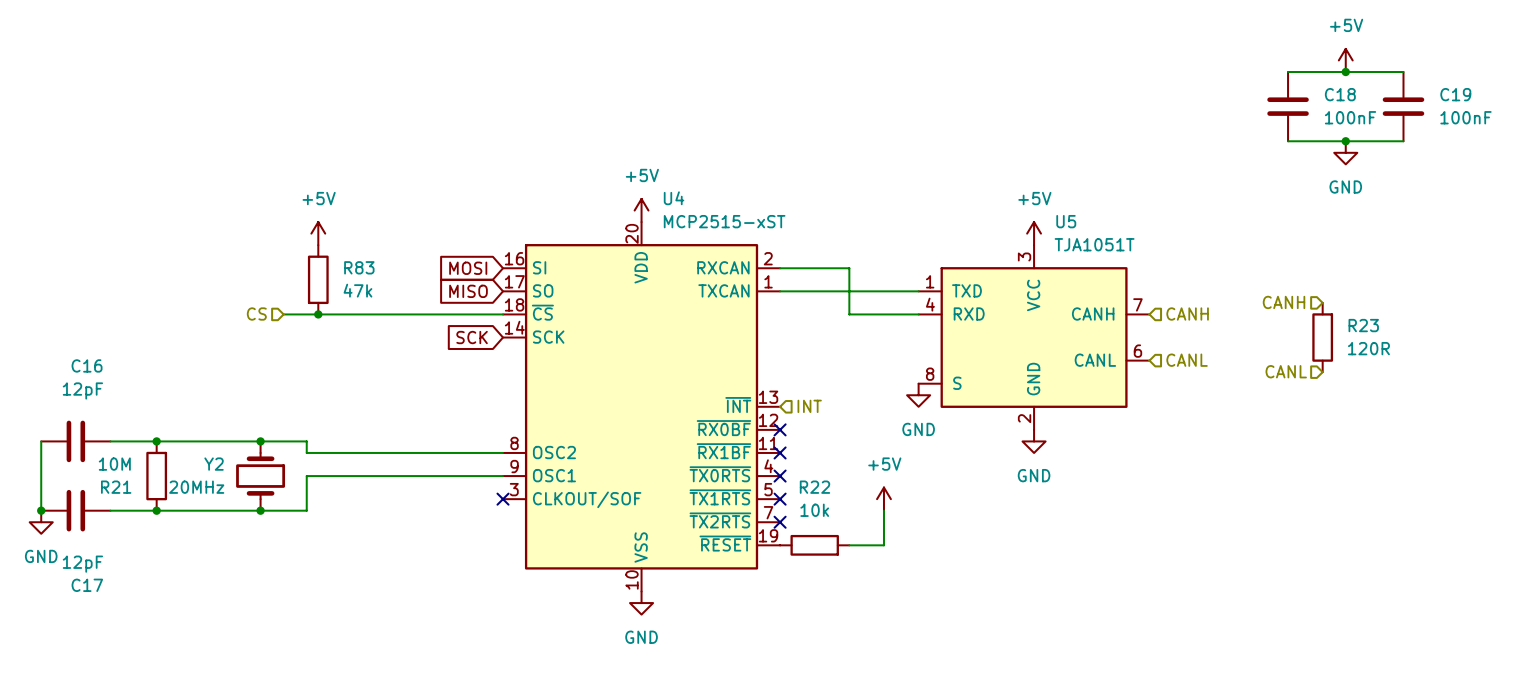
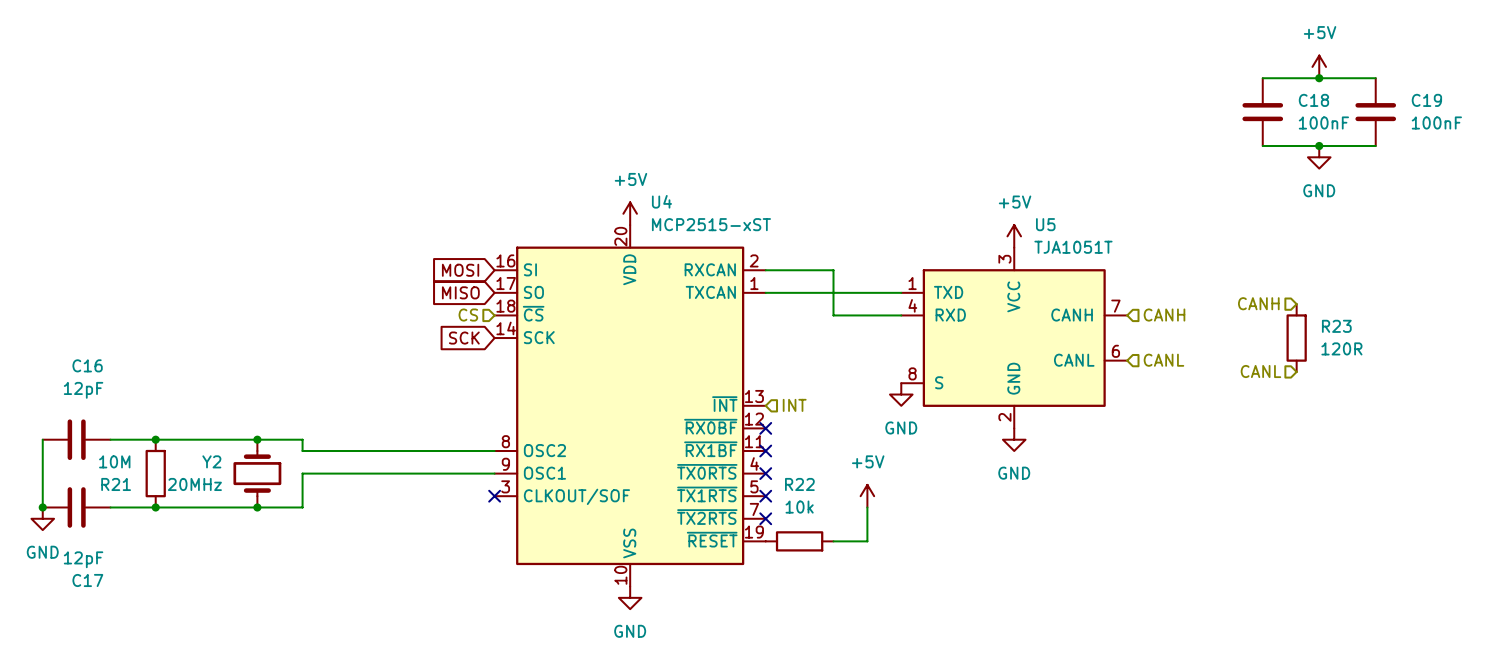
power symbol: +5V (318, 233) -> none
R83: 47k (318, 279) -> none
hierarchical label position: CS (256, 314) -> CS (468, 315)
wire: (283, 314) (503, 314) -> none
junction: (318, 314) -> none

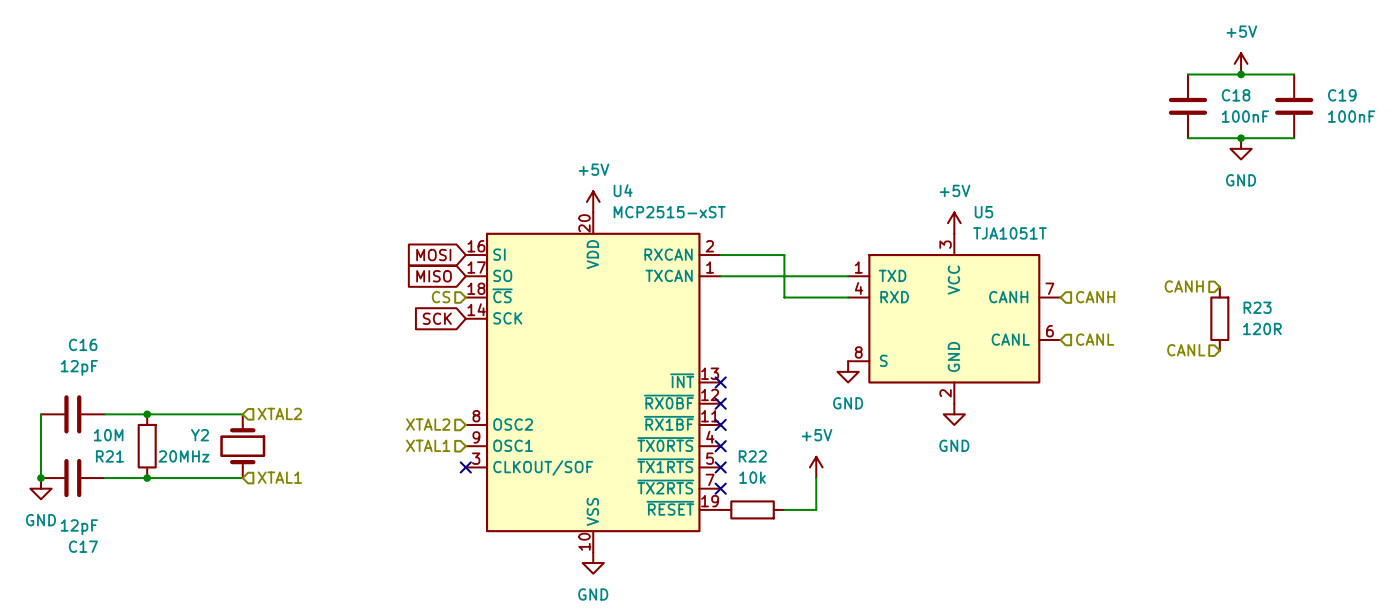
no-connect mark: none -> (720, 382)
hierarchical label: INT (794, 405) -> none
wire: (257, 439) (302, 439) (302, 451) (494, 451) -> none
junction: (257, 439) -> none
hierarchical label: none -> XTAL2 (279, 413)
hierarchical label: none -> XTAL2 (428, 424)
hierarchical label: none -> XTAL1 (428, 445)
wire: (494, 473) (302, 473) (302, 507) (257, 507) -> none
junction: (257, 507) -> none
hierarchical label: none -> XTAL1 (279, 477)

